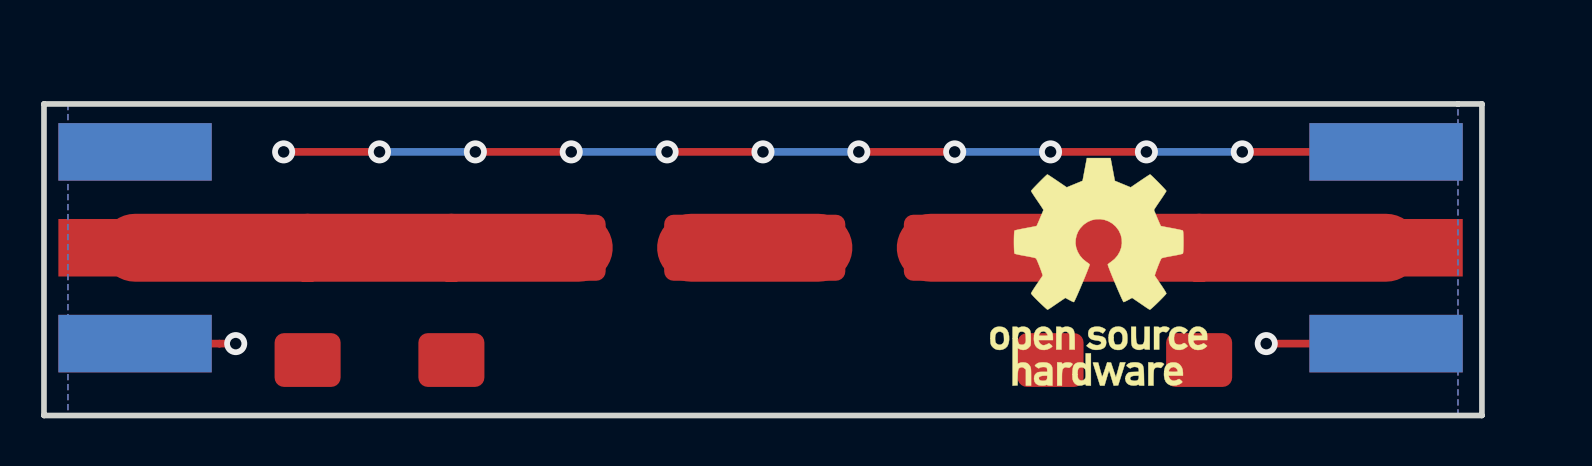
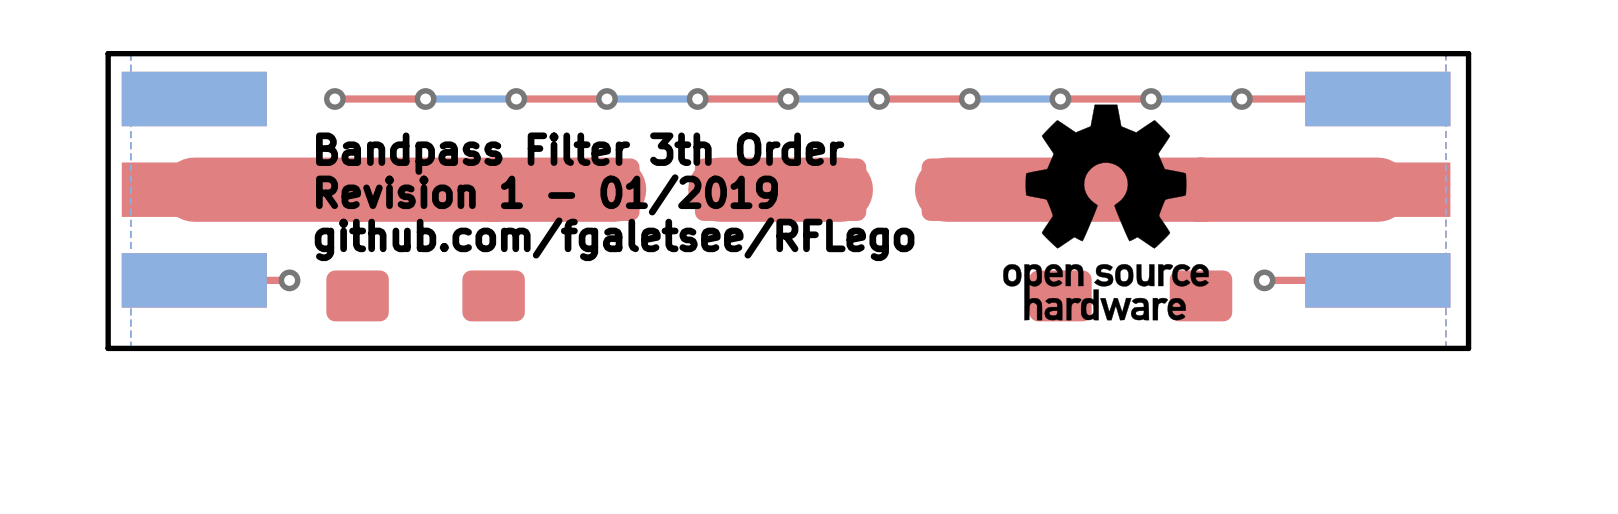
text: none -> Bandpass Filter 3th Order (580, 153)
text: none -> Revision 1 - 01/2019 (547, 194)
text: none -> github.com/fgaletsee/RFLego (614, 239)

